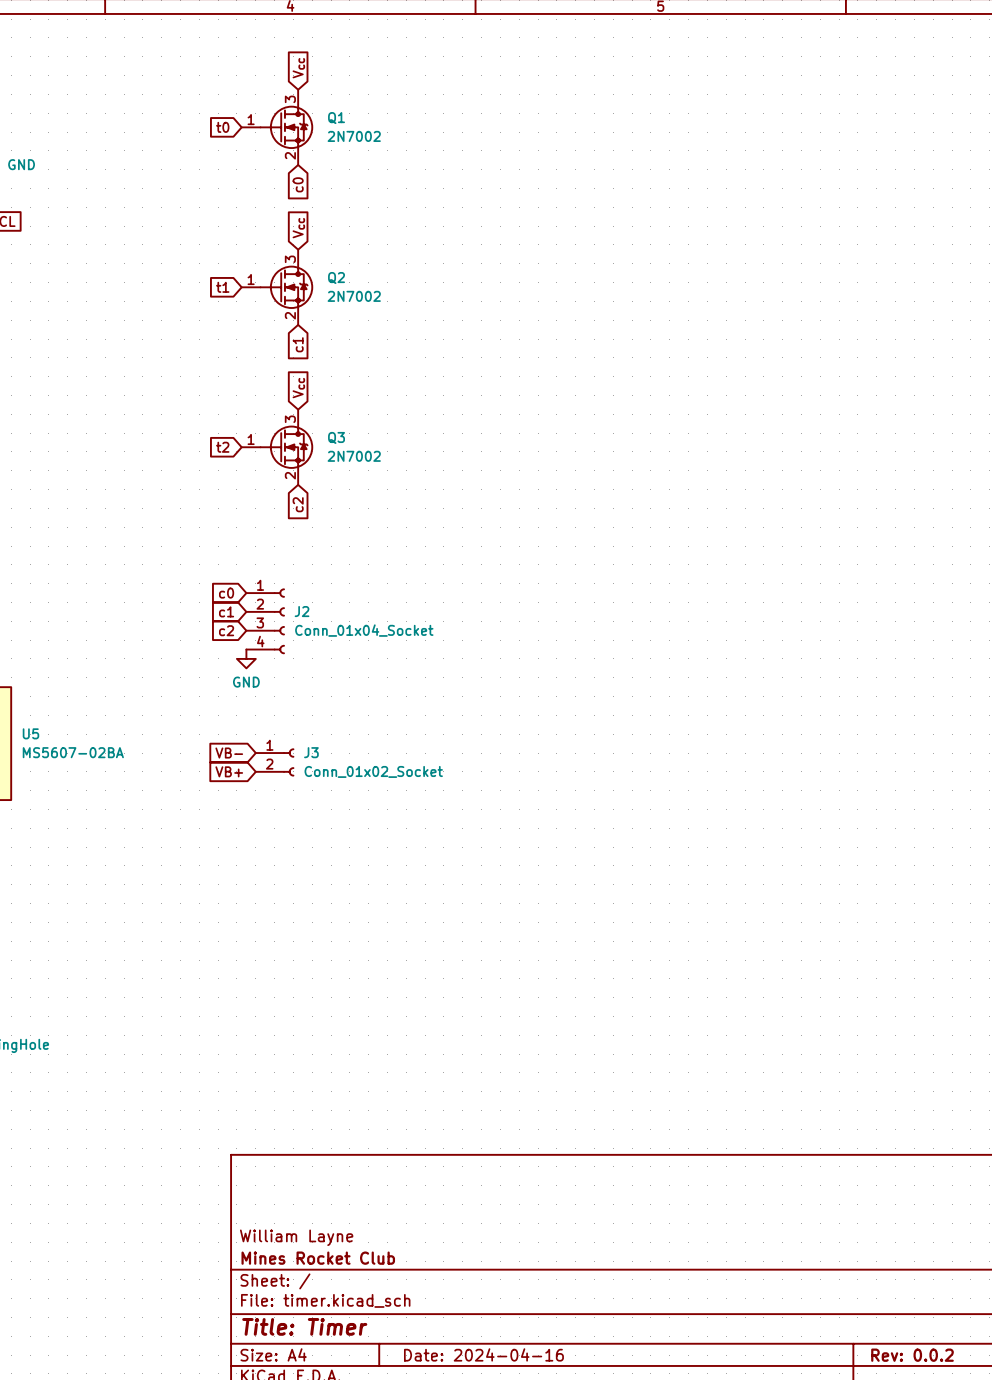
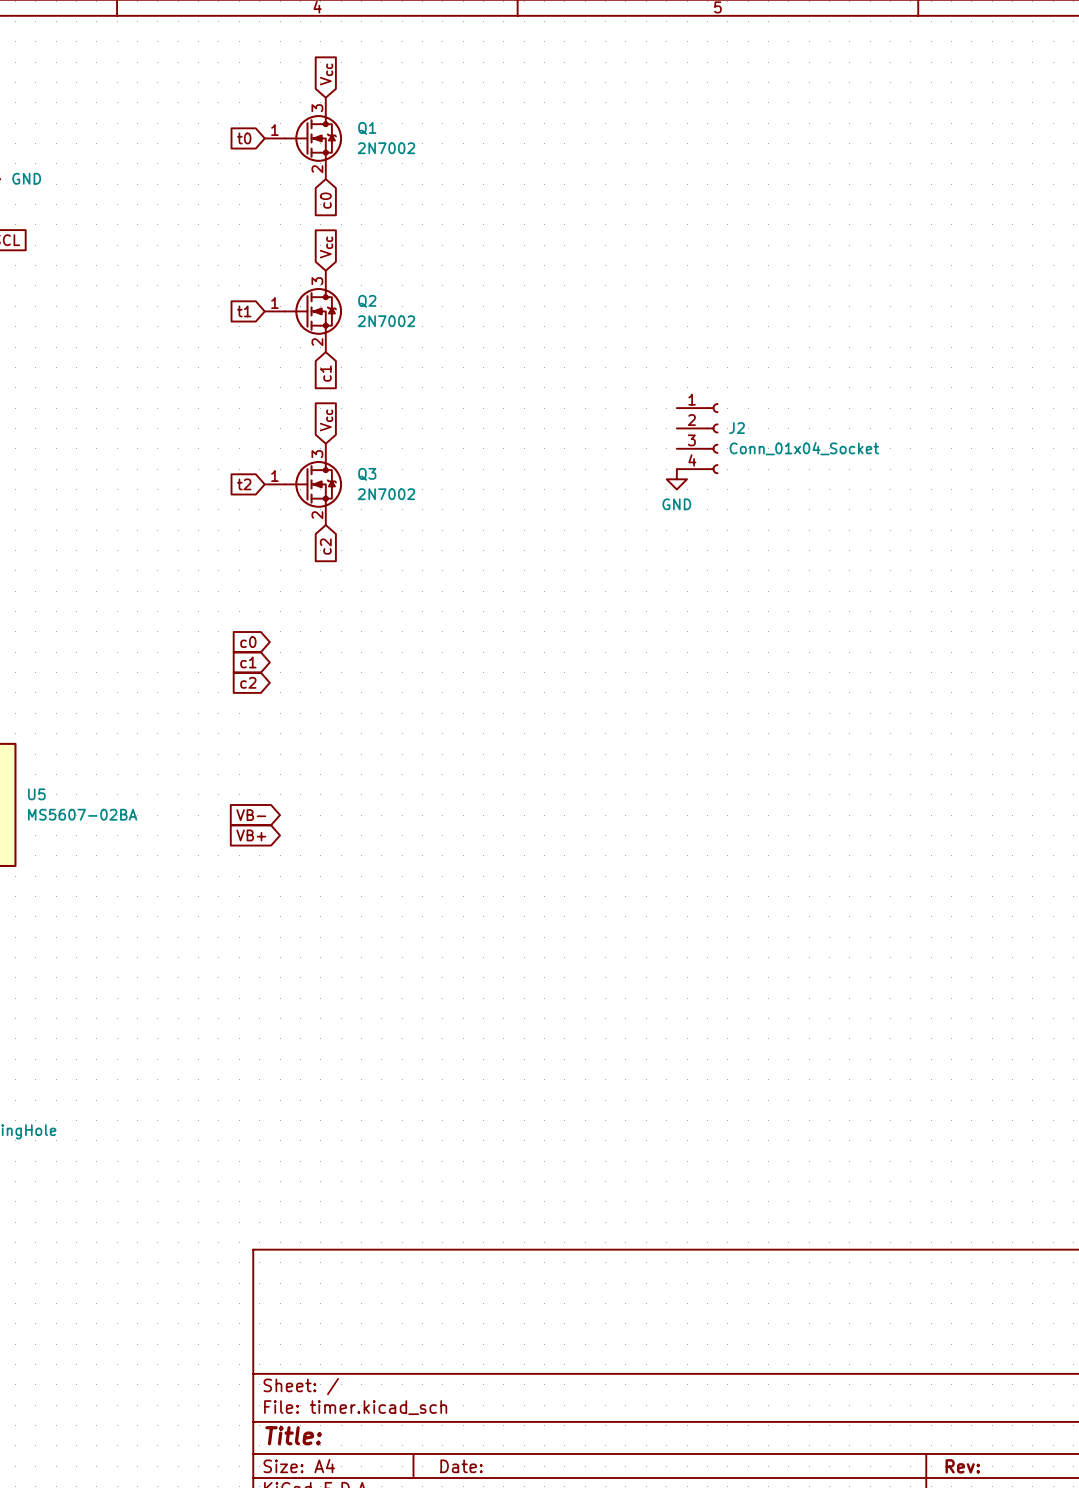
power symbol: none -> GND (676, 479)
J2 position: (265, 621) -> (697, 438)
power symbol: GND (246, 658) -> none
J3: Conn_01x02_Socket (274, 762) -> none
title block: William Layne (296, 1237) -> none
title block: Mines Rocket Club (318, 1258) -> none
title block: Title: Timer (304, 1326) -> Title: (293, 1435)
title block: Date: 2024-04-16 (483, 1354) -> Date: (461, 1466)
title block: Rev: 0.0.2 (912, 1355) -> Rev: (962, 1466)

